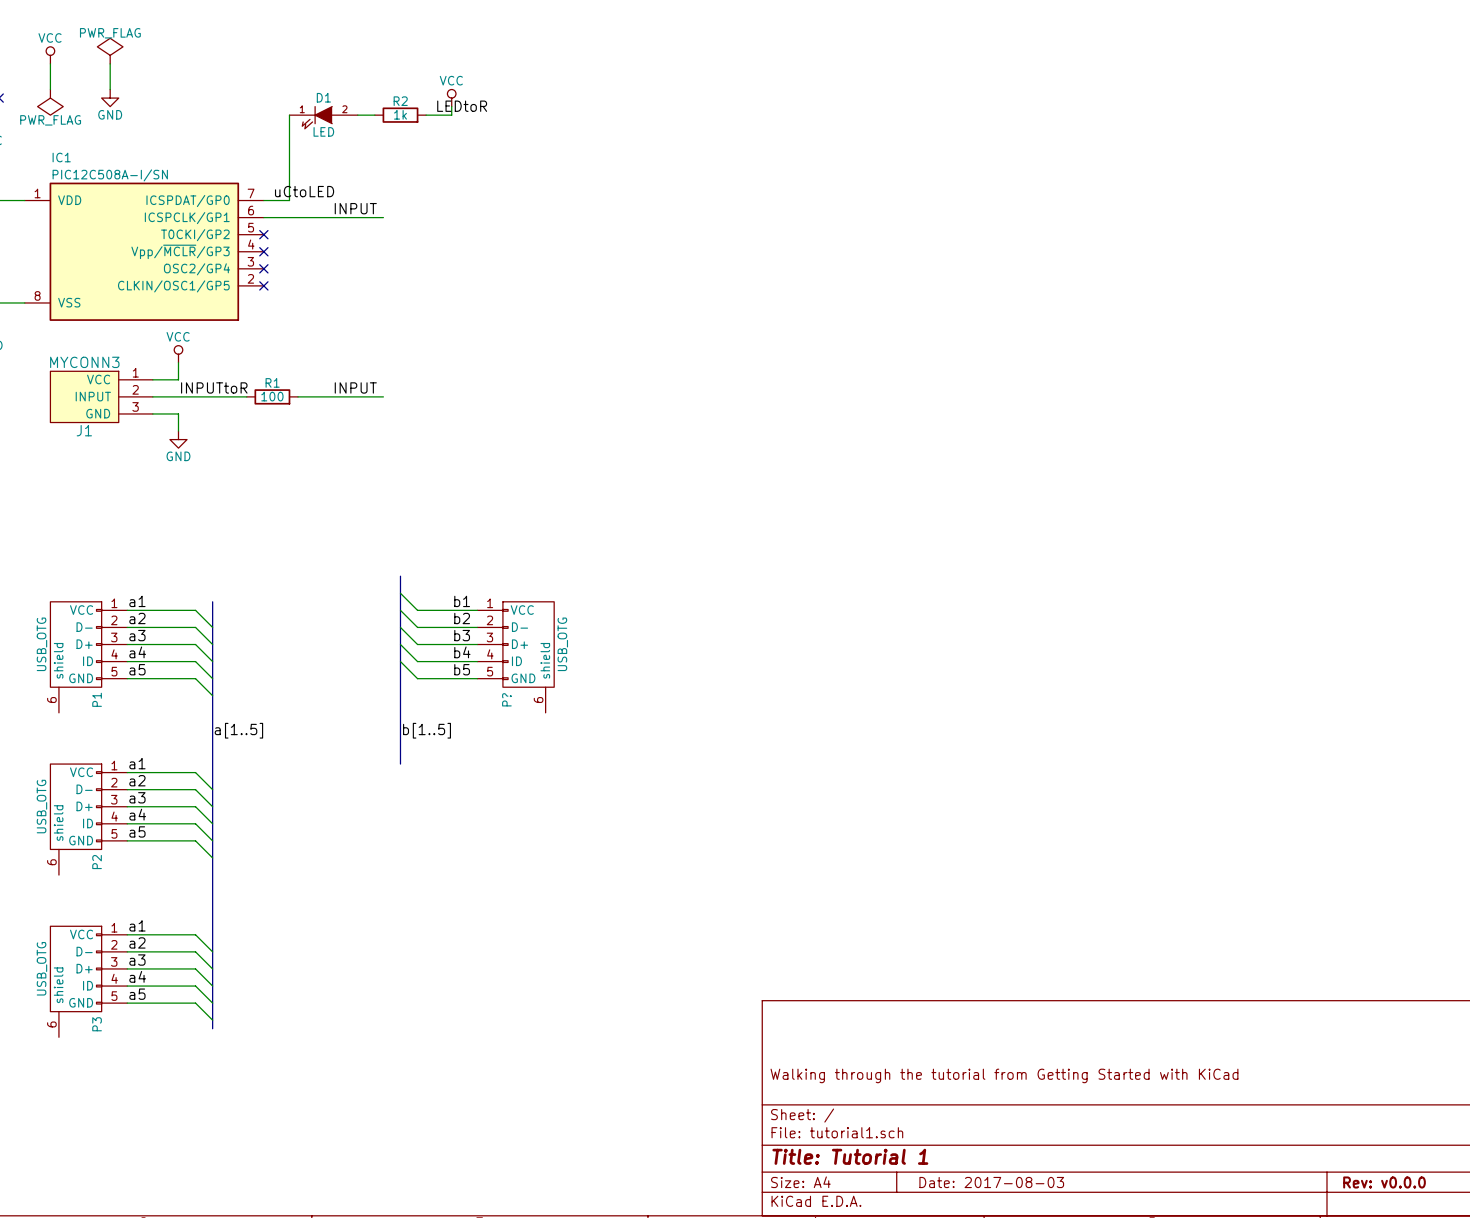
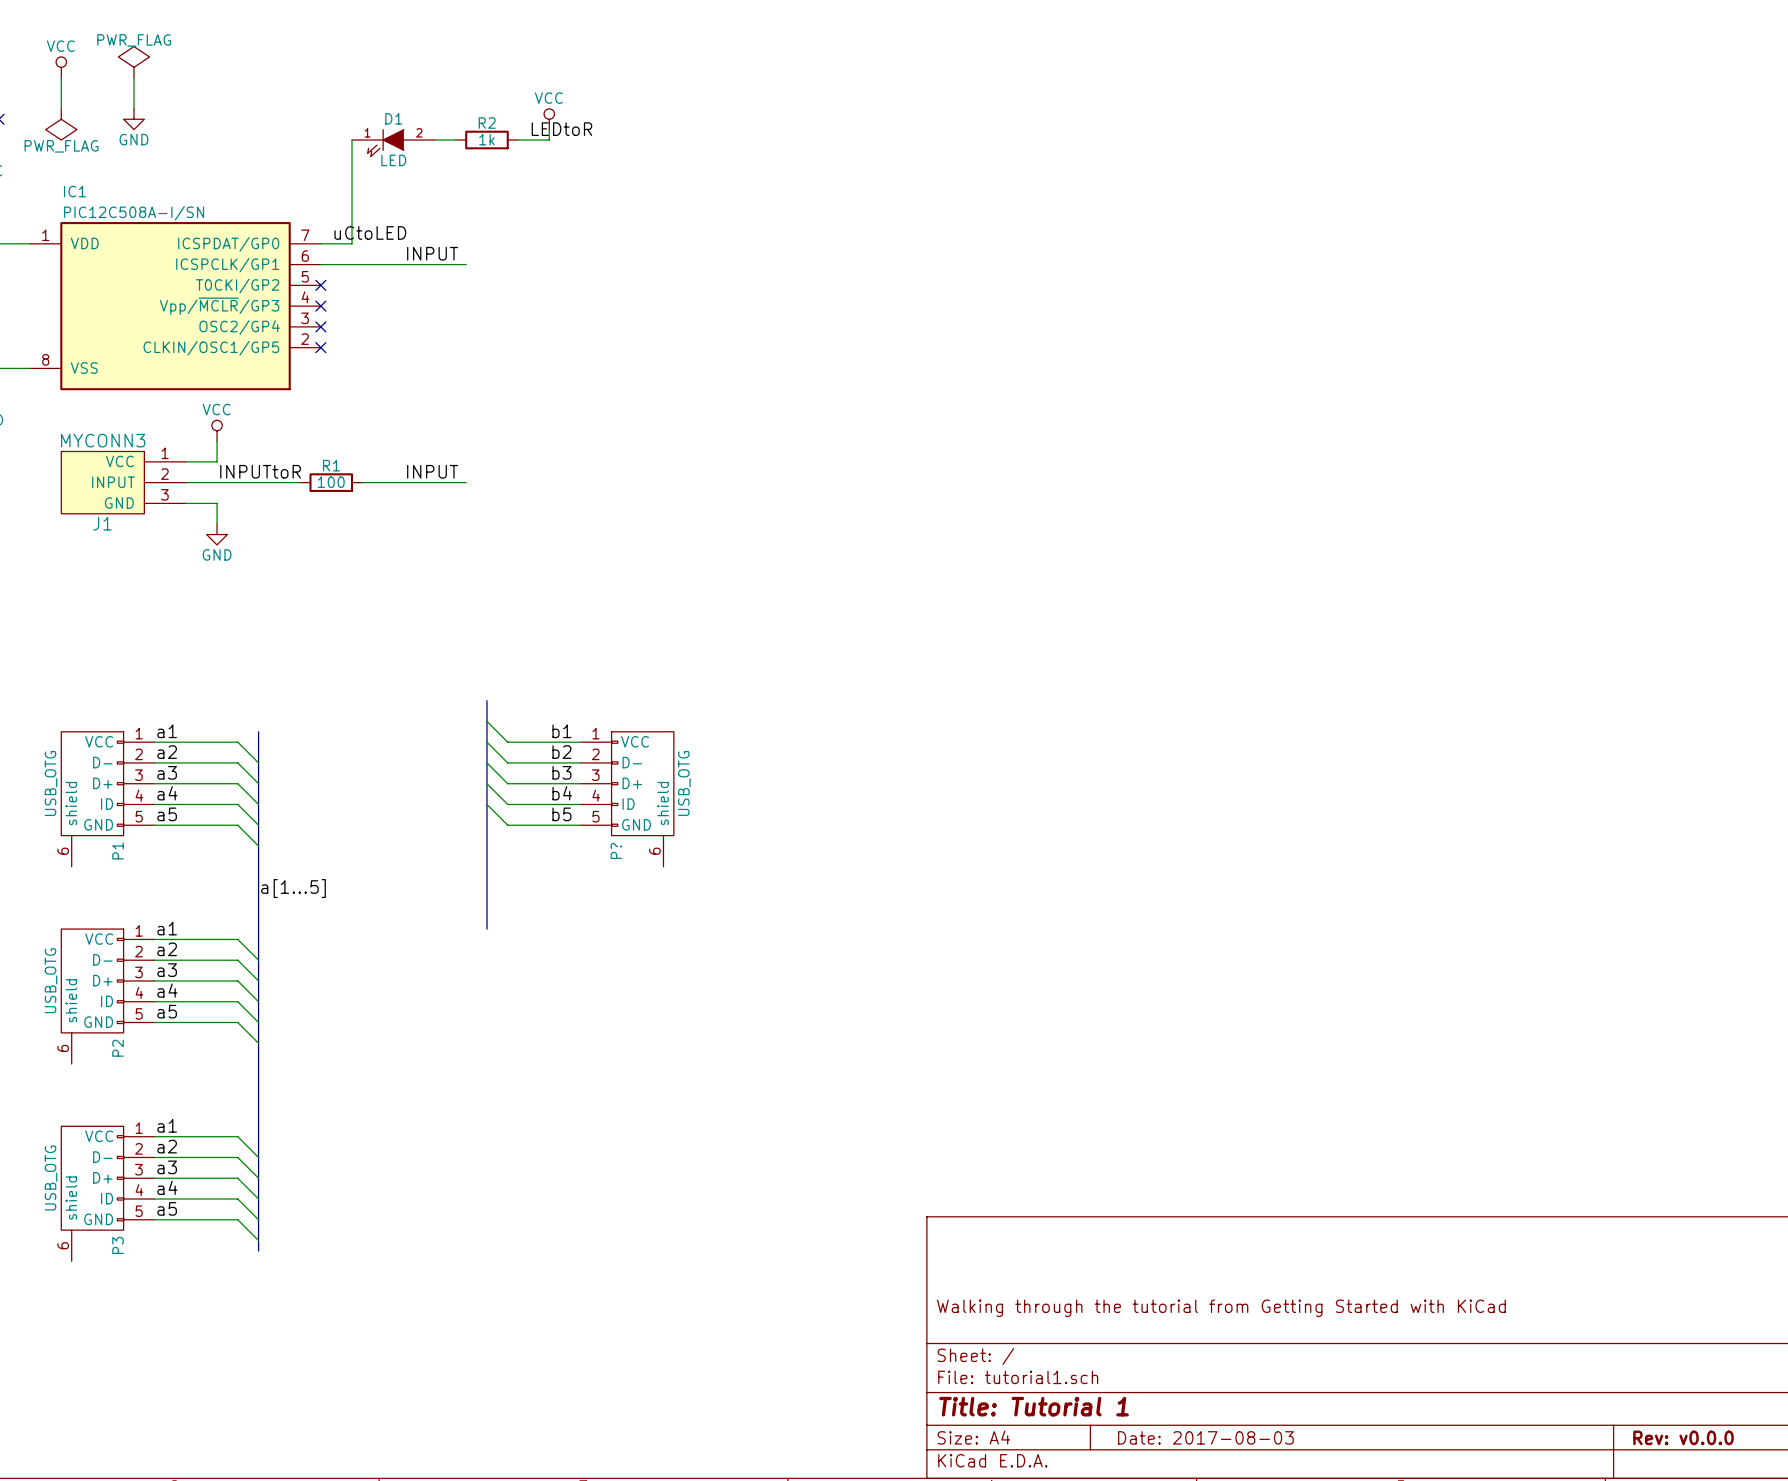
label: a[1..5] (238, 730) -> a[1...5] (293, 888)
label: b[1..5] (427, 730) -> none

